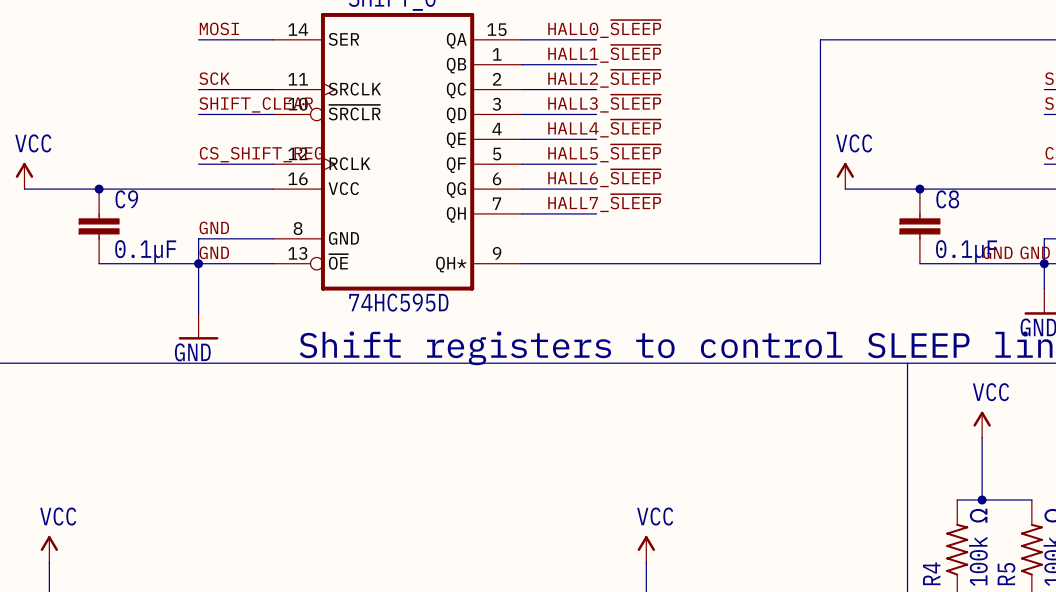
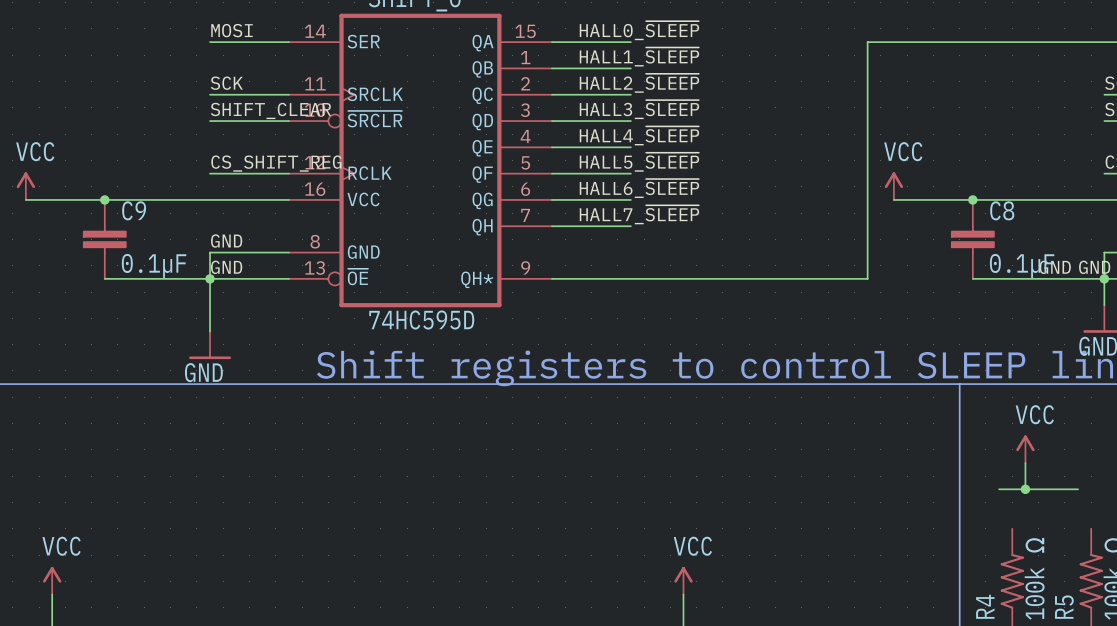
power symbol position: VCC (982, 424) -> VCC (1025, 449)
wire: none -> (1025, 463) (1025, 489)
wire: (982, 437) (982, 500) -> none
wire: (957, 500) (1031, 500) -> (999, 489) (1078, 489)
junction position: (982, 500) -> (1025, 489)

